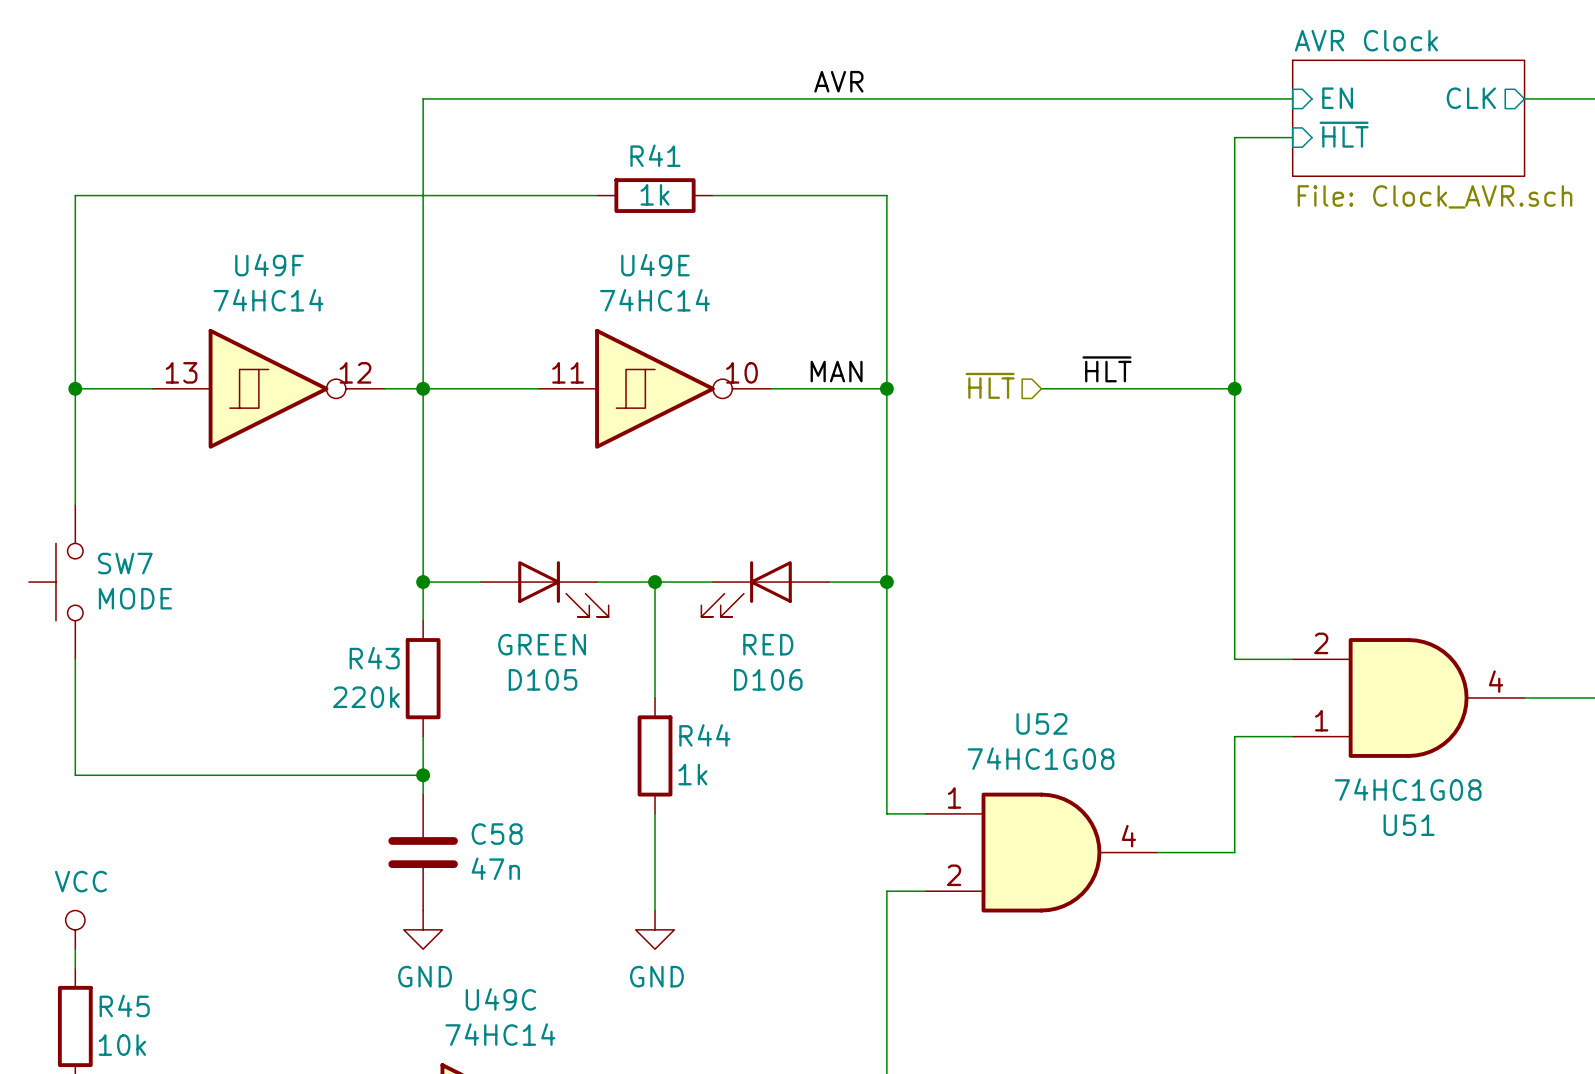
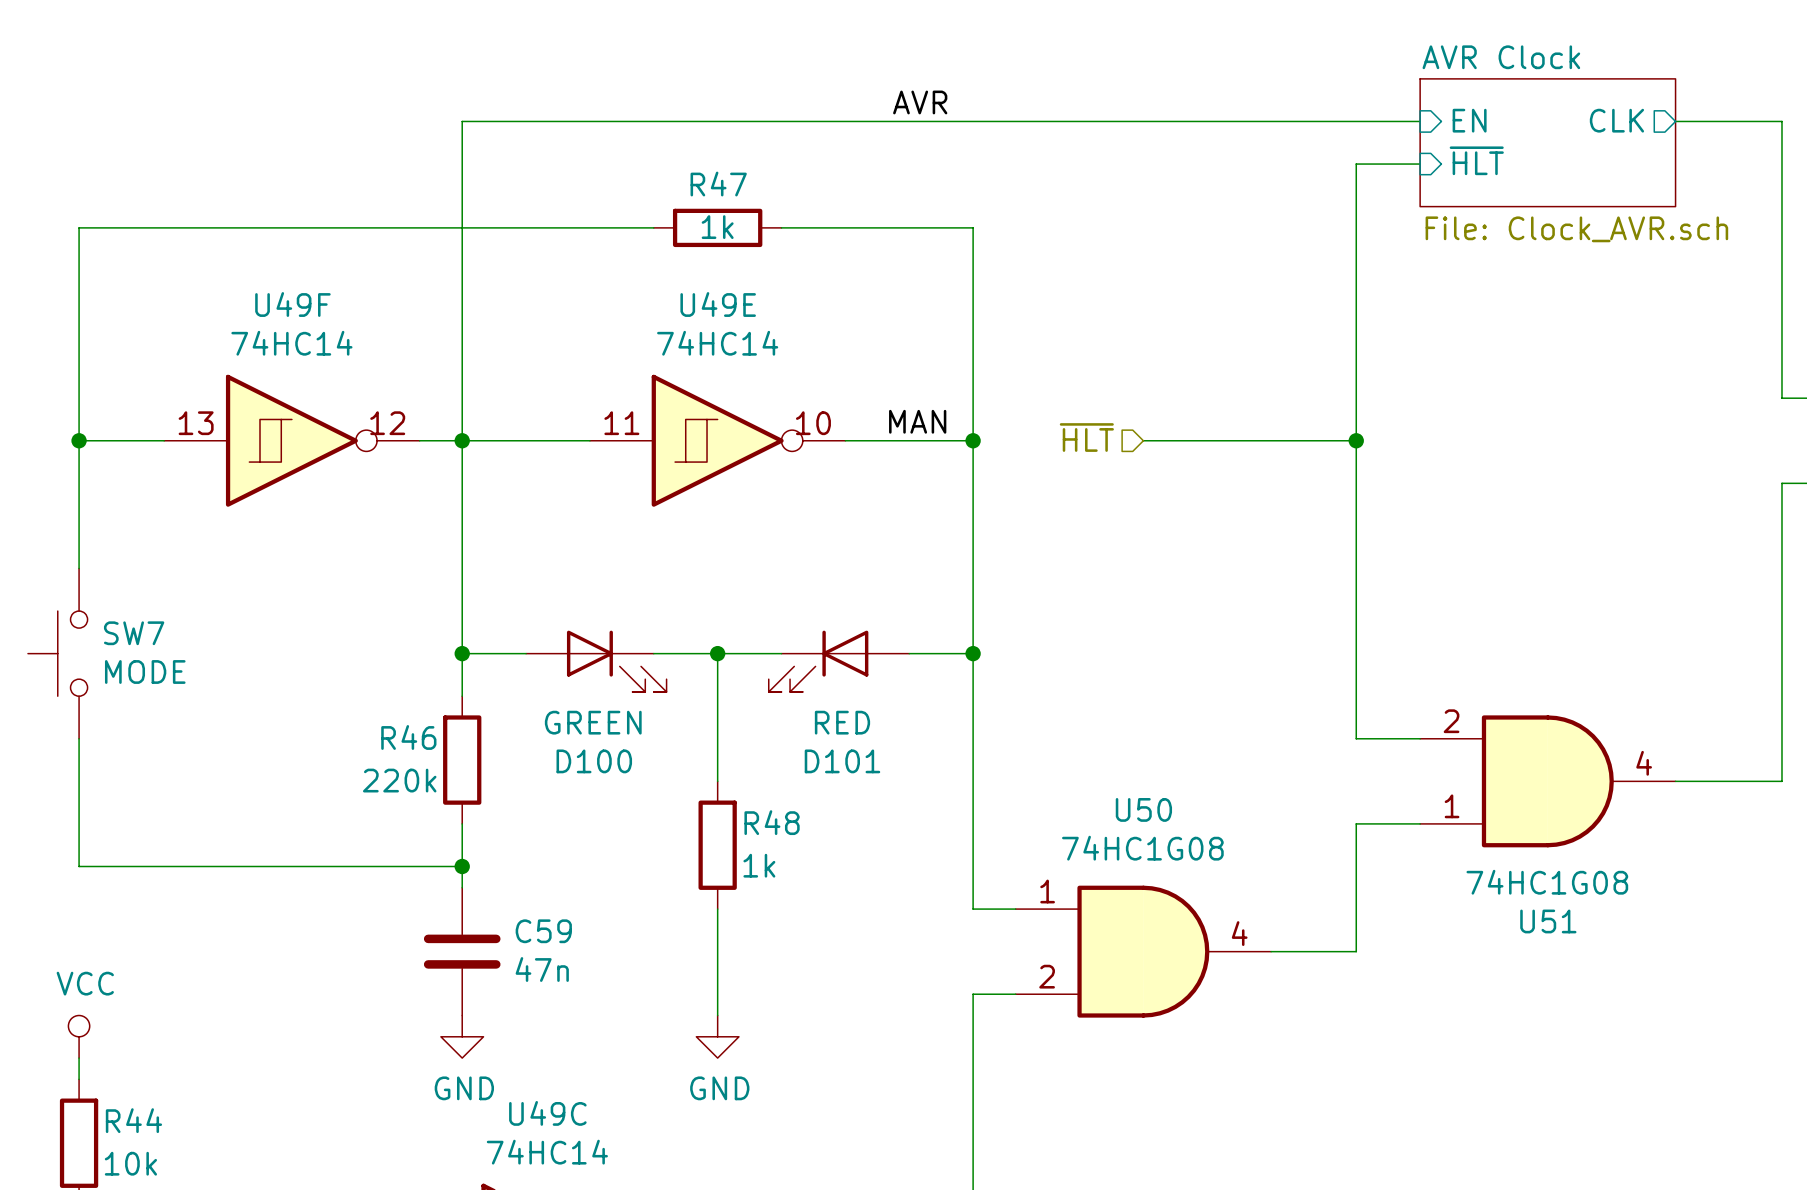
R41 name: R41 (655, 155) -> R47 (718, 184)
label: ~{HLT} (1107, 369) -> none
R43 name: R43 (374, 658) -> R46 (408, 737)
D105 name: D105 (543, 679) -> D100 (594, 761)
D106 name: D106 (768, 679) -> D101 (842, 761)
U52 name: U52 (1041, 723) -> U50 (1143, 809)
R44 name: R44 (704, 735) -> R48 (772, 822)
C58 name: C58 (497, 834) -> C59 (543, 931)
R45 name: R45 (124, 1005) -> R44 (133, 1120)

